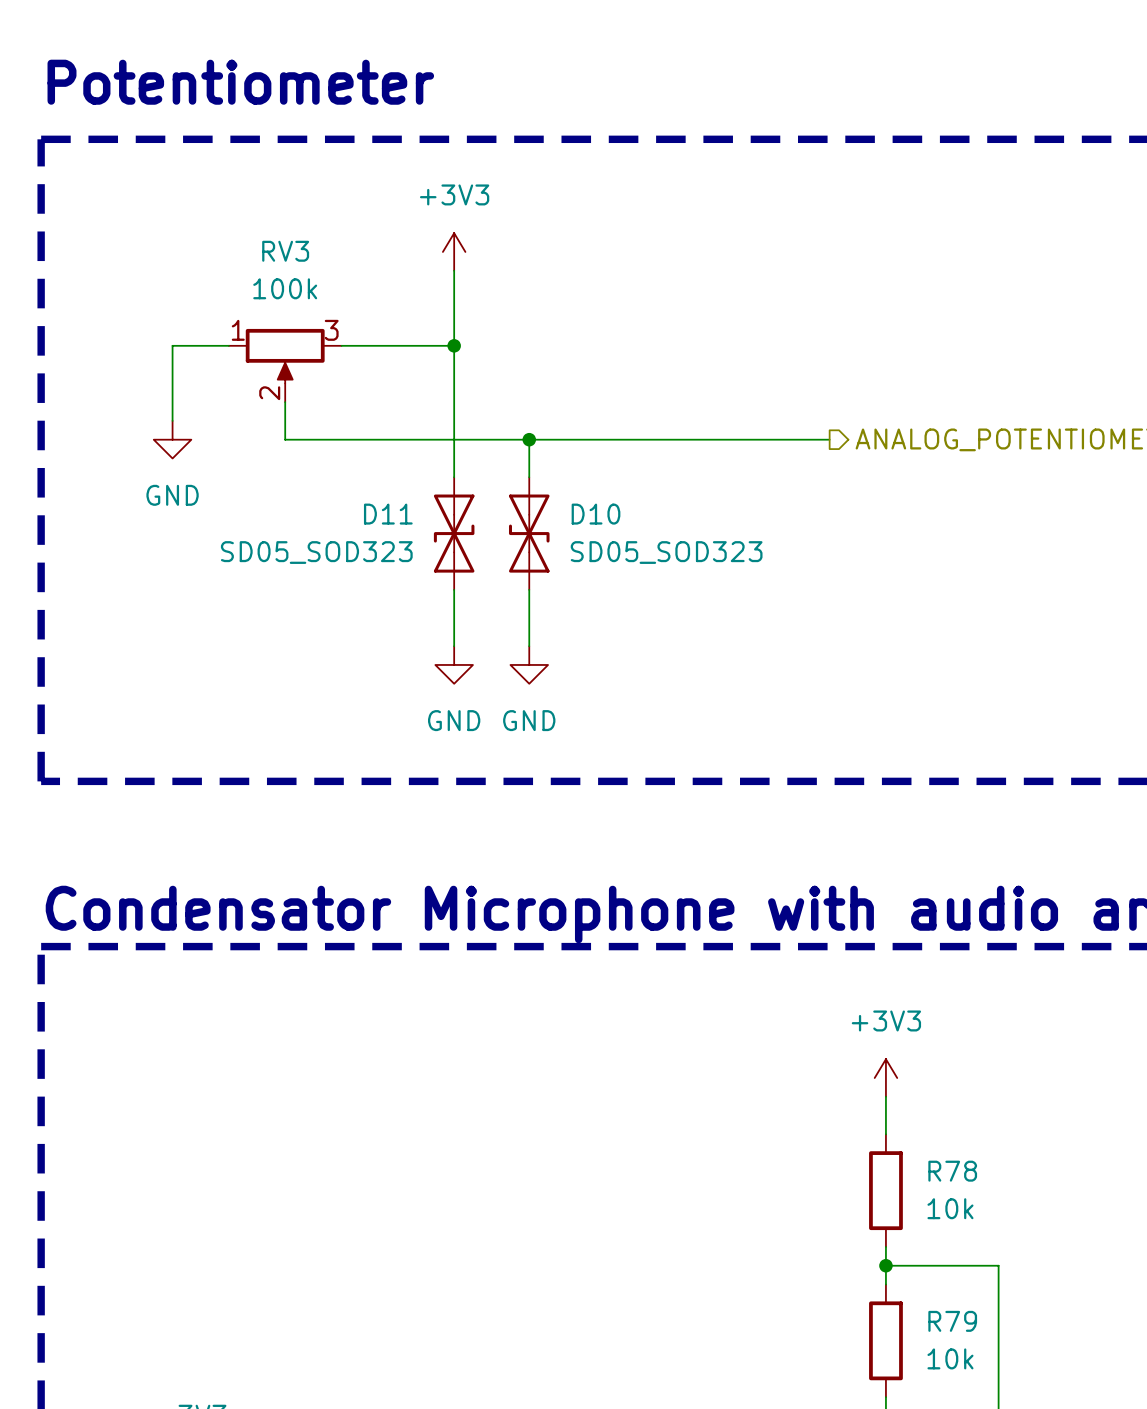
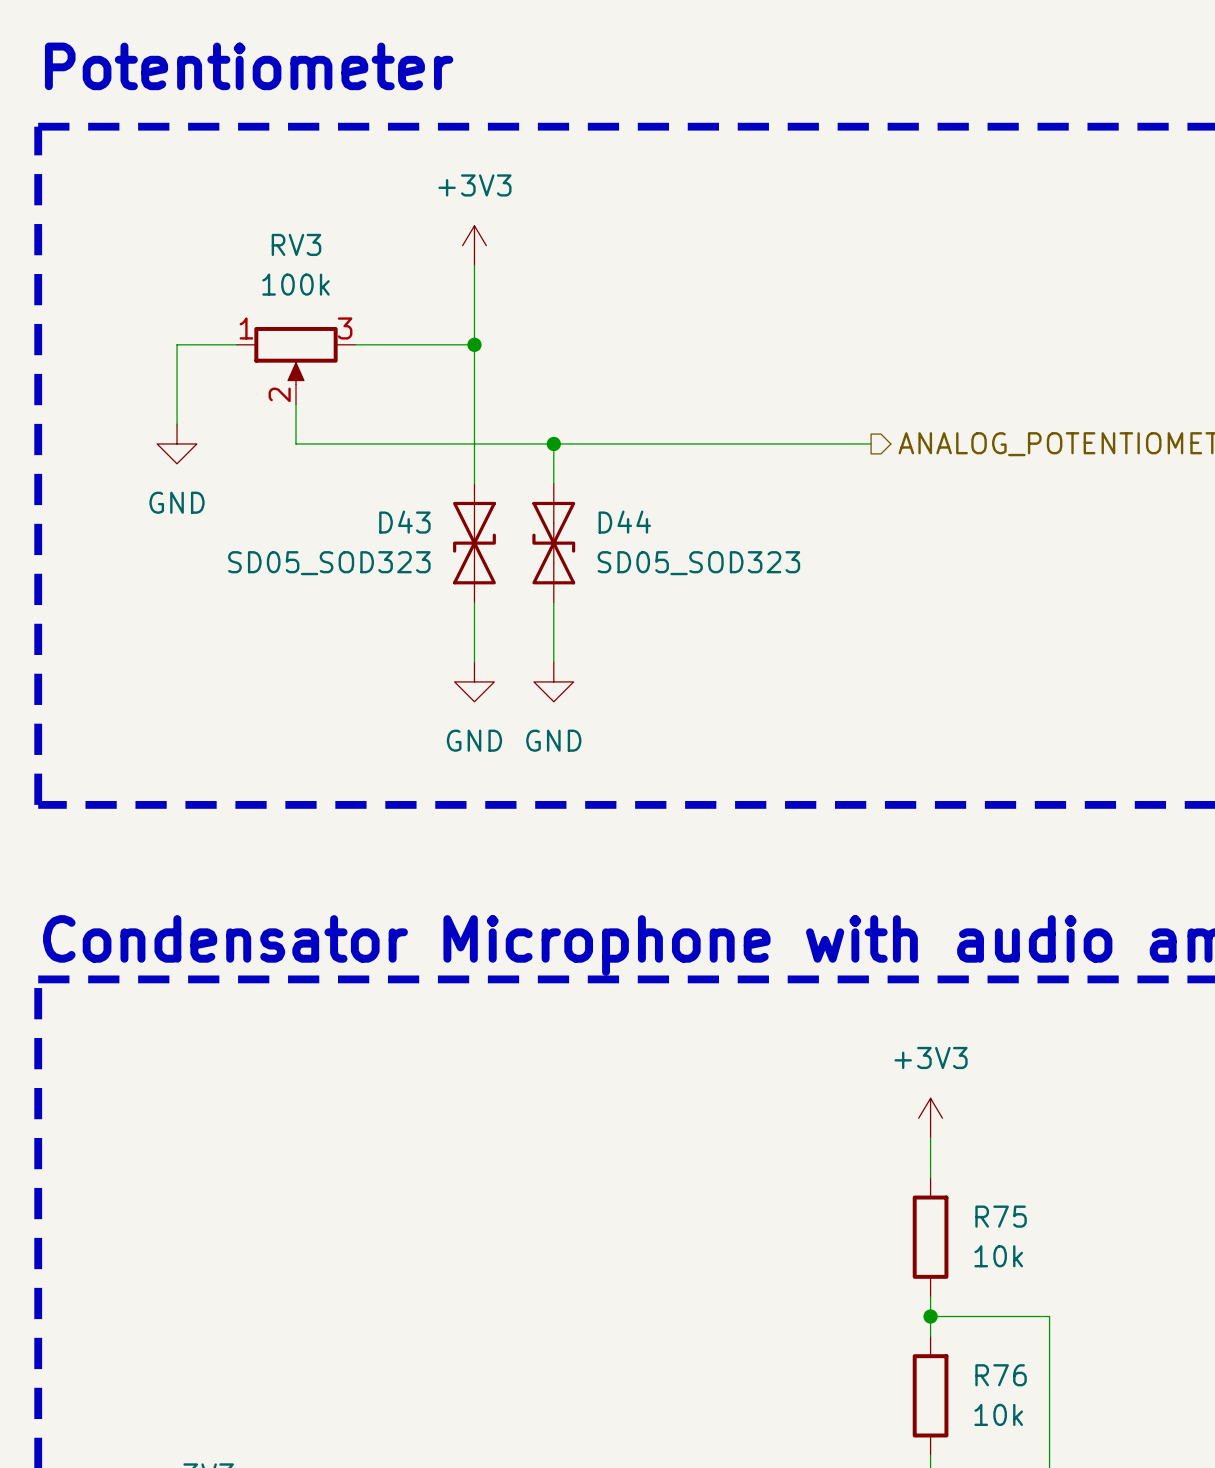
D11 name: D11 (388, 514) -> D43 (404, 522)
D10 name: D10 (596, 514) -> D44 (624, 522)
R78 name: R78 (952, 1171) -> R75 (1001, 1216)
R79 name: R79 (952, 1321) -> R76 (1001, 1375)

